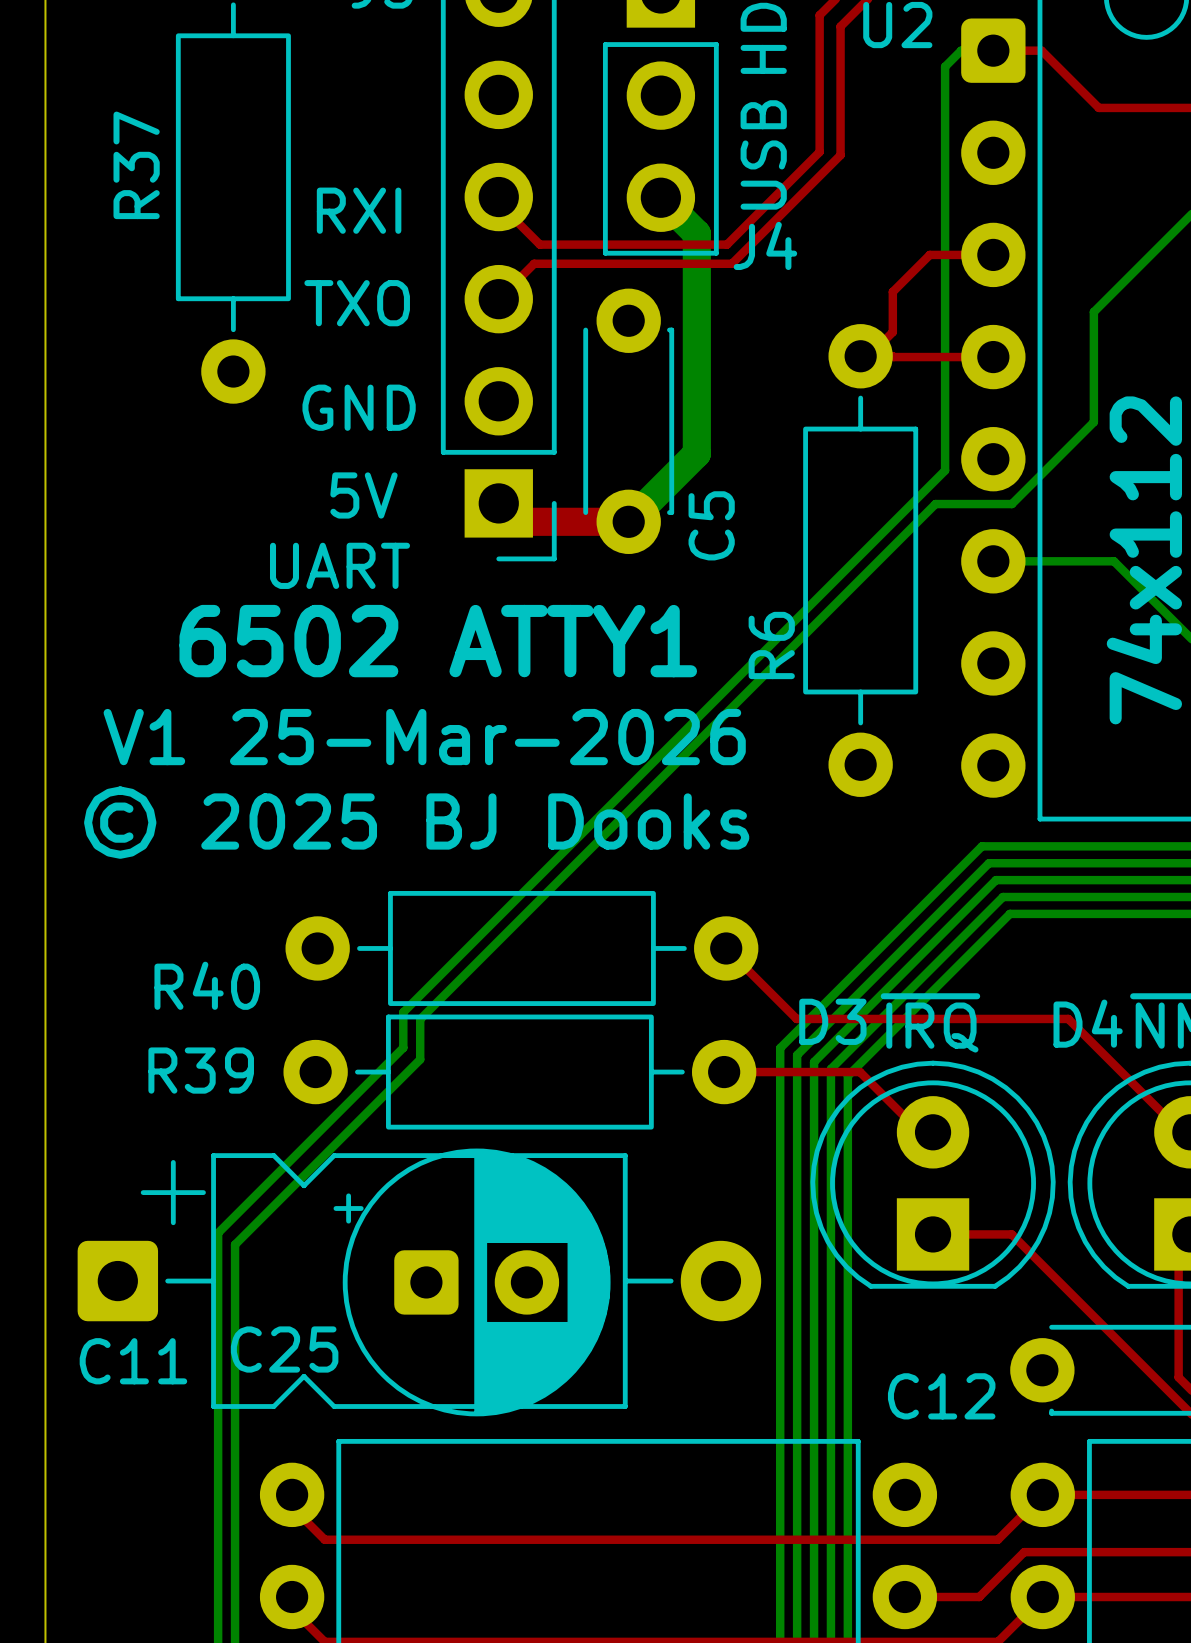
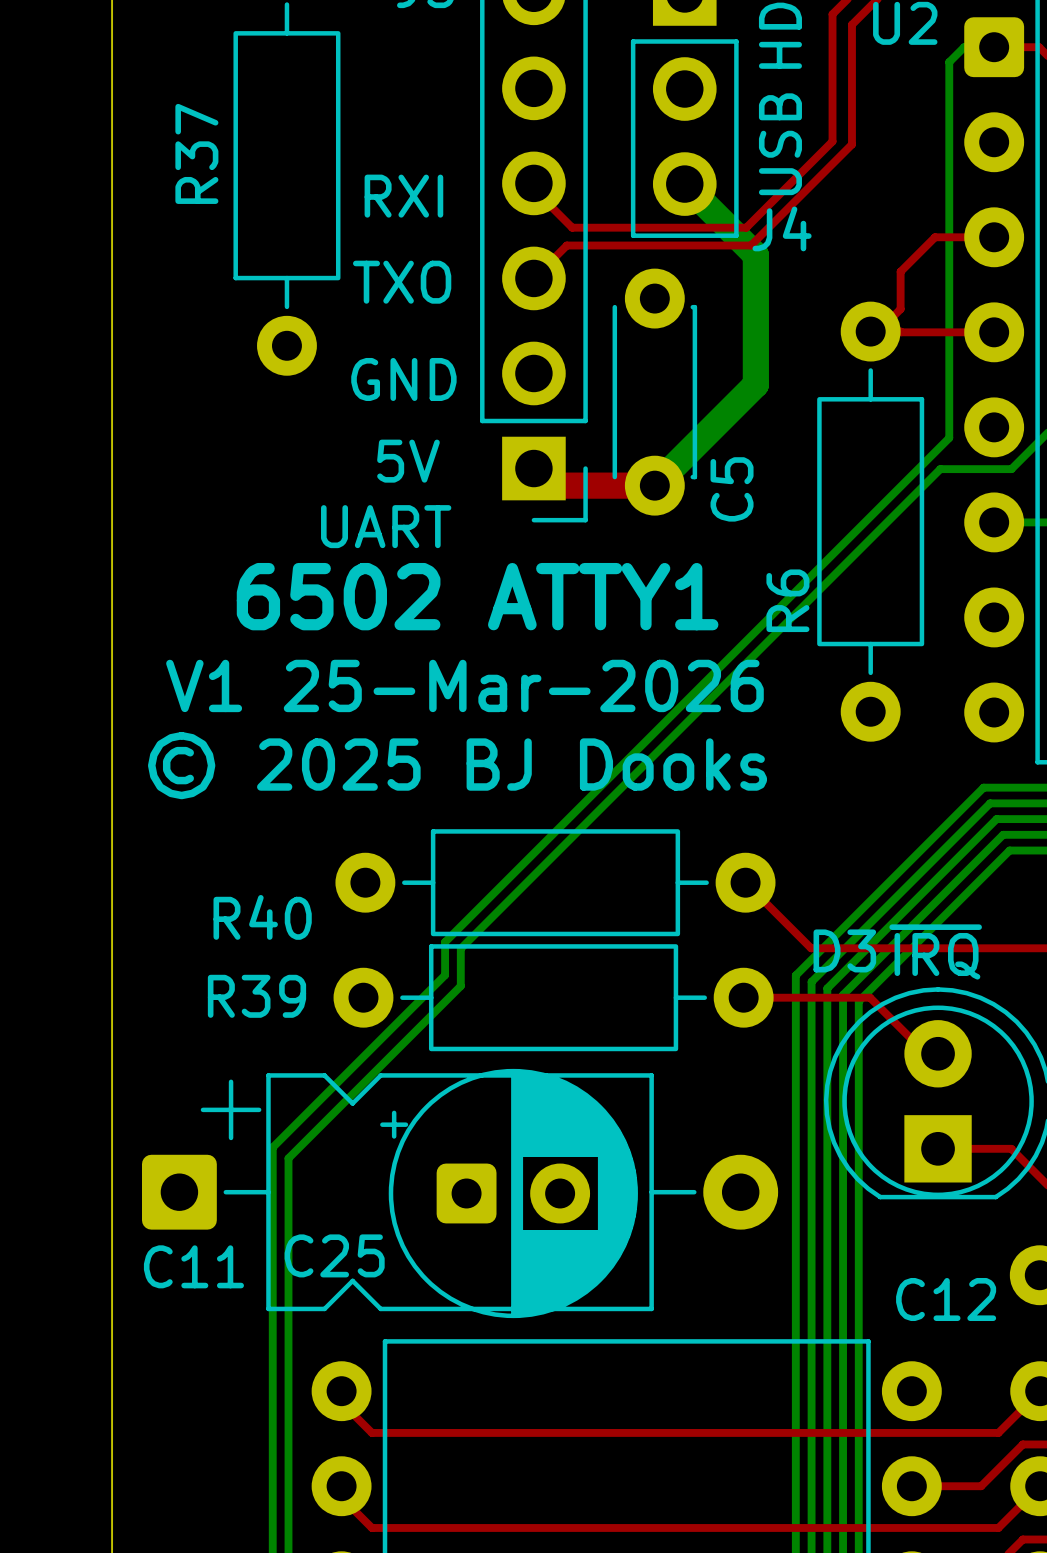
bottom track: (696, 233) (696, 453) -> (718, 217) (755, 255) (755, 384) (718, 422)

